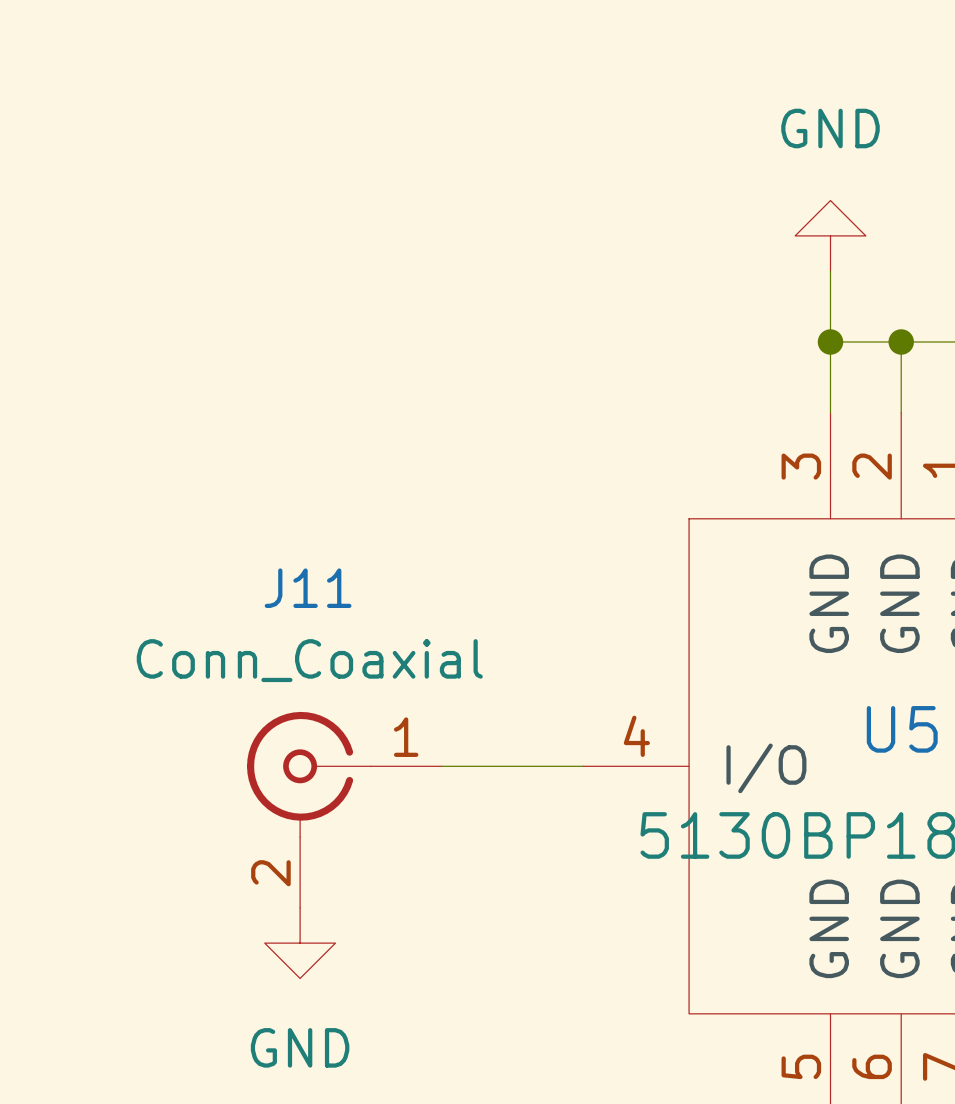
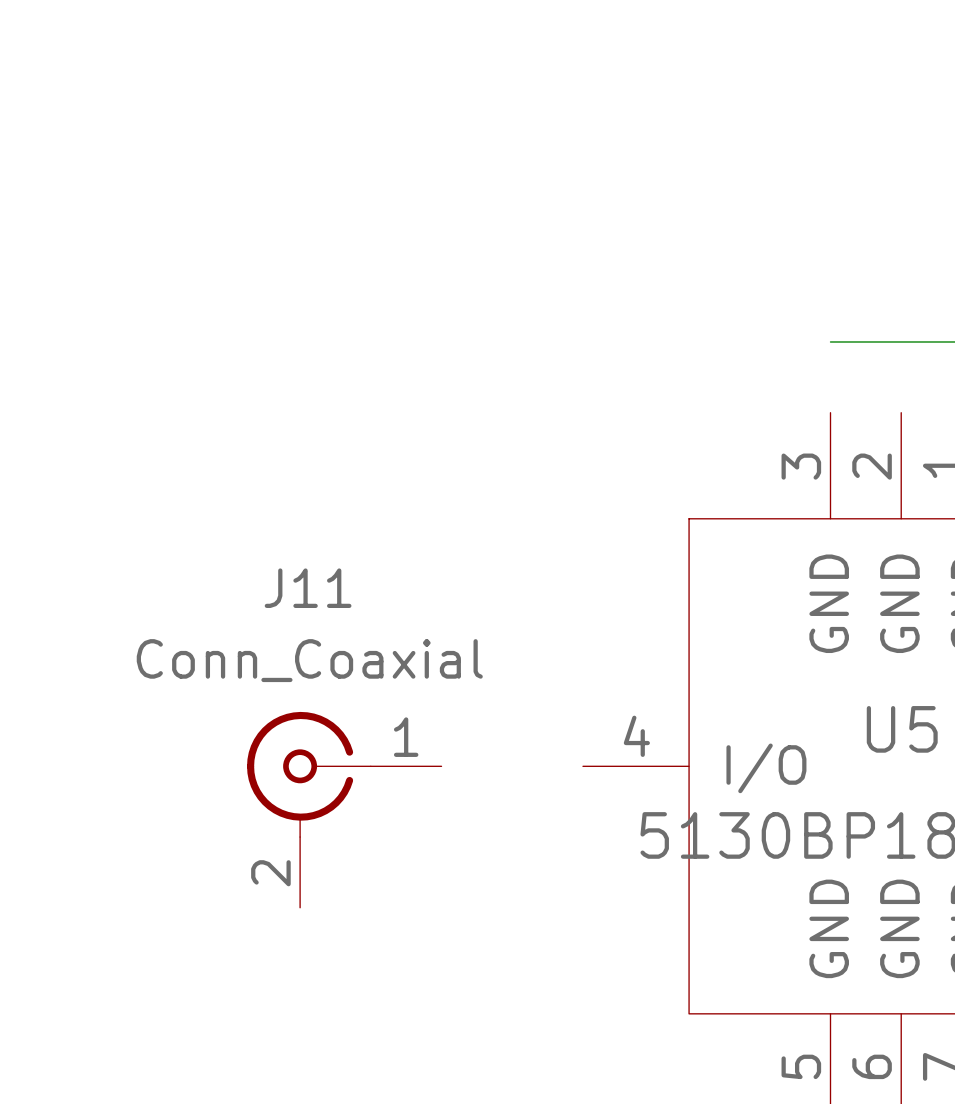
power symbol: GND (830, 235) -> none
wire: (830, 271) (830, 412) -> none
junction: (830, 341) -> none
wire: (901, 341) (901, 412) -> none
junction: (901, 341) -> none
wire: (441, 766) (582, 766) -> none
power symbol: GND (300, 943) -> none

